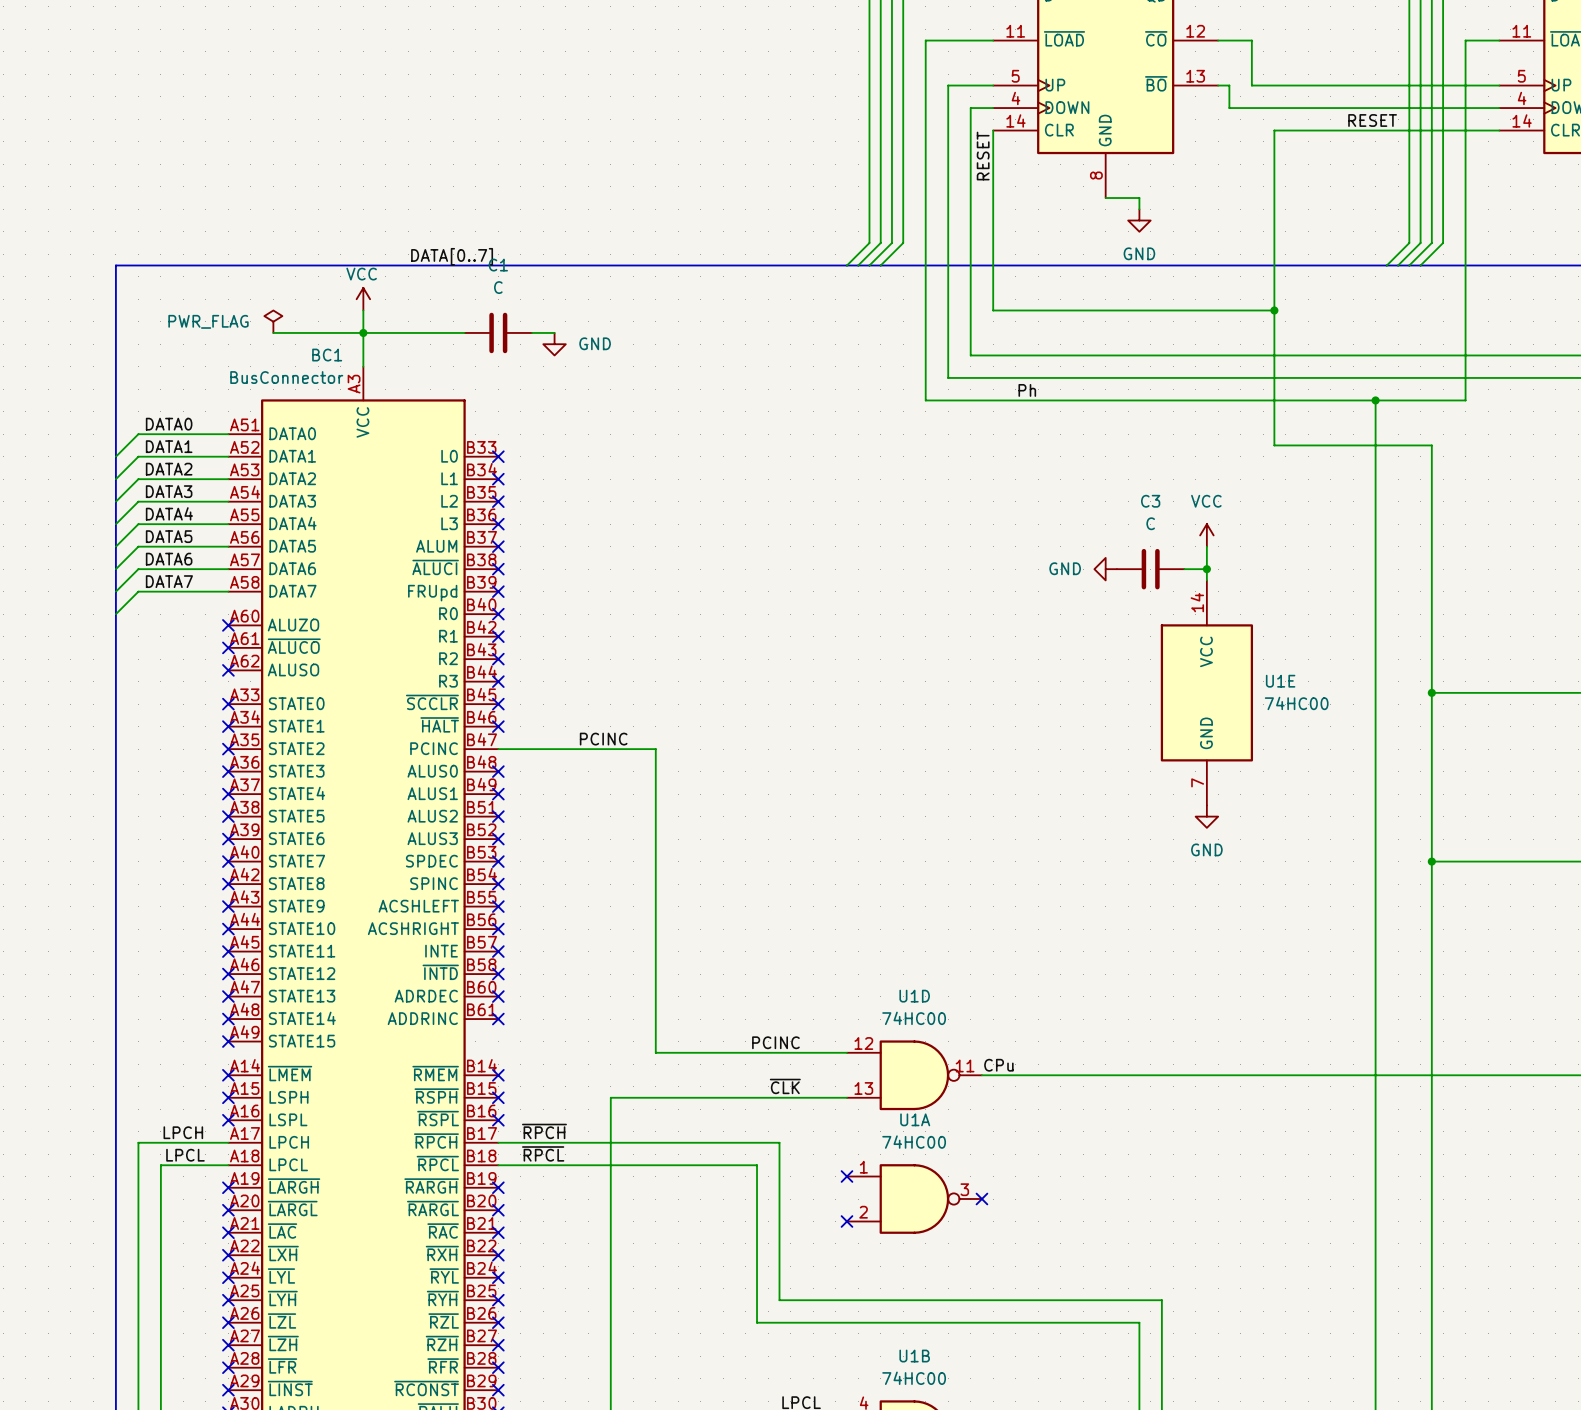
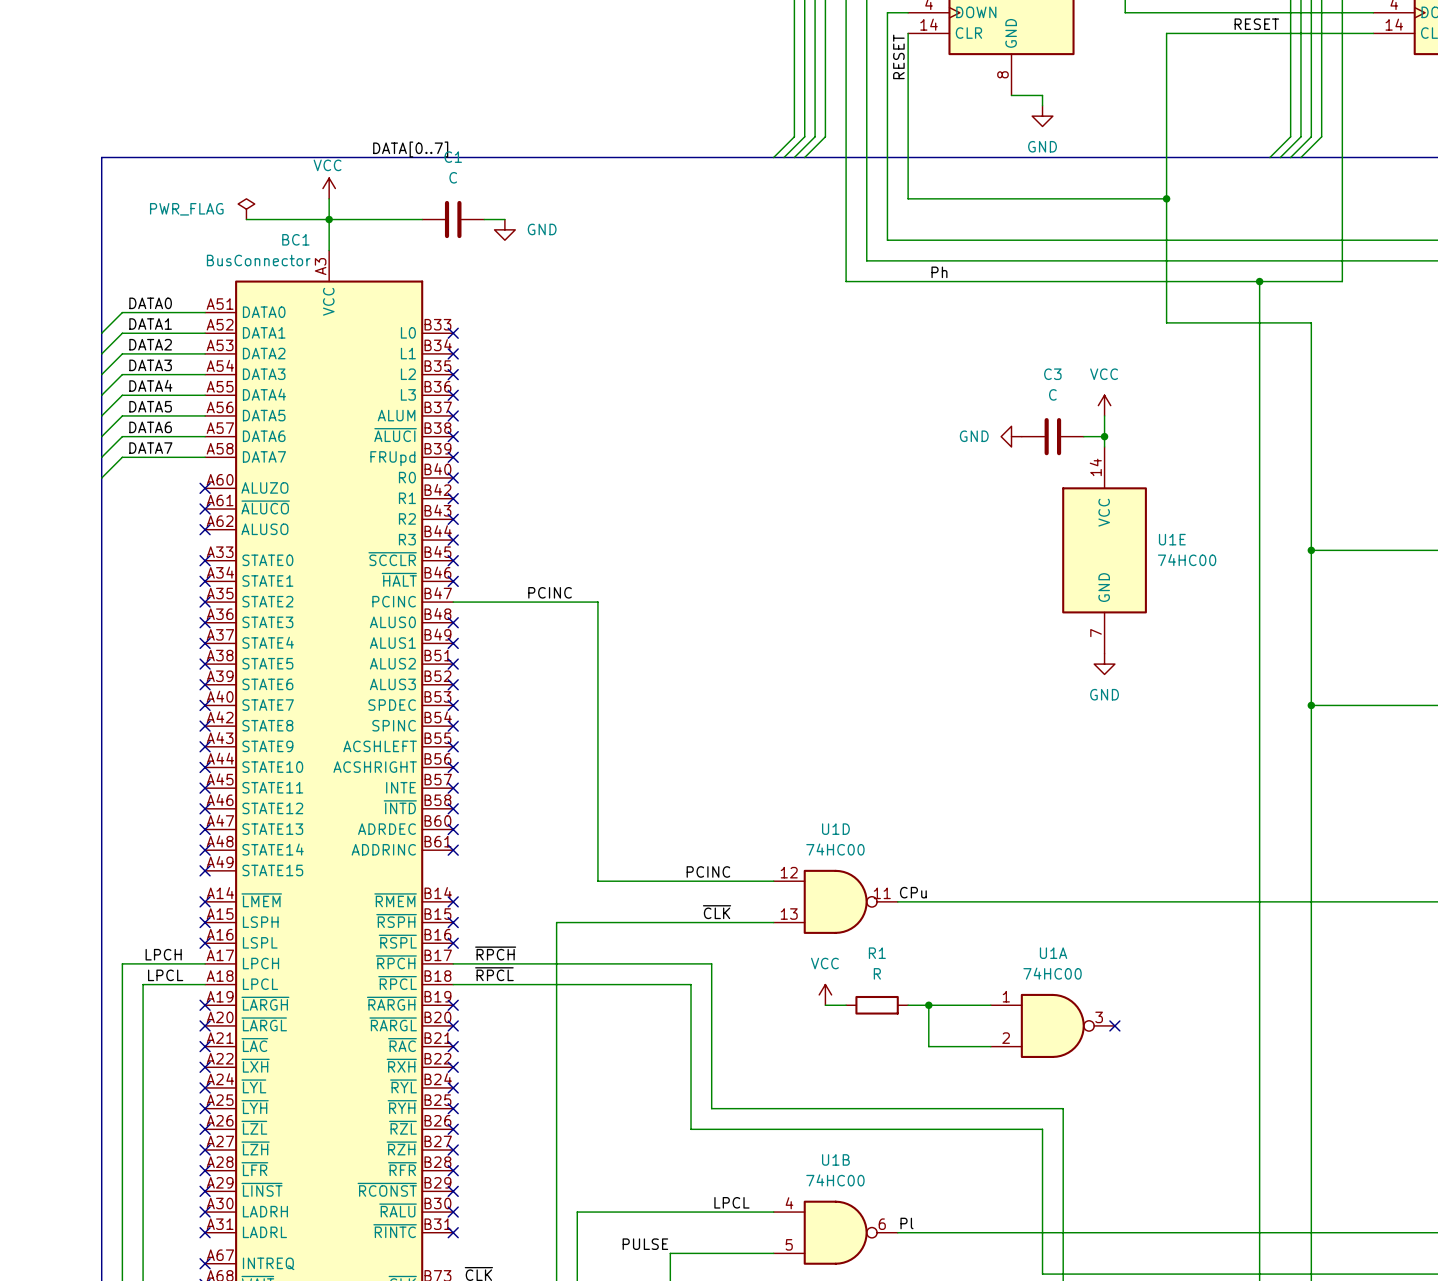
no-connect mark: (846, 1176) -> none
power symbol: none -> VCC (825, 994)
R1: none -> R (877, 1005)
wire: none -> (908, 1005) (990, 1005)
wire: none -> (928, 1005) (928, 1046) (990, 1046)
junction: none -> (928, 1005)
U1A position: (914, 1199) -> (1052, 1025)
no-connect mark: (981, 1199) -> none
no-connect mark: none -> (1114, 1025)
no-connect mark: (846, 1221) -> none

